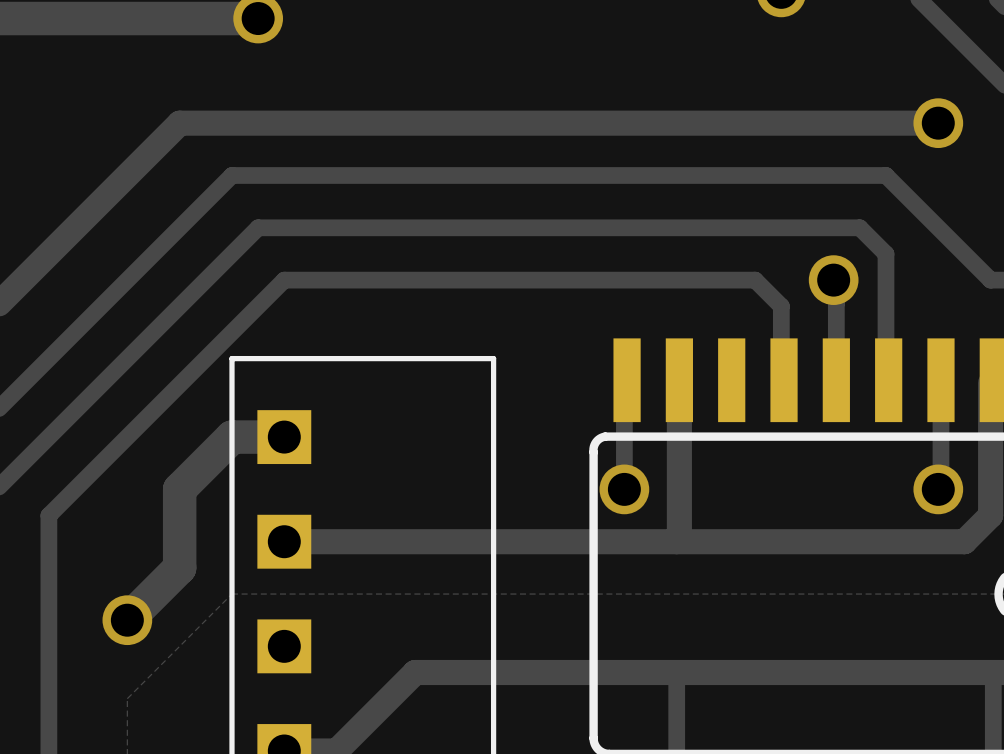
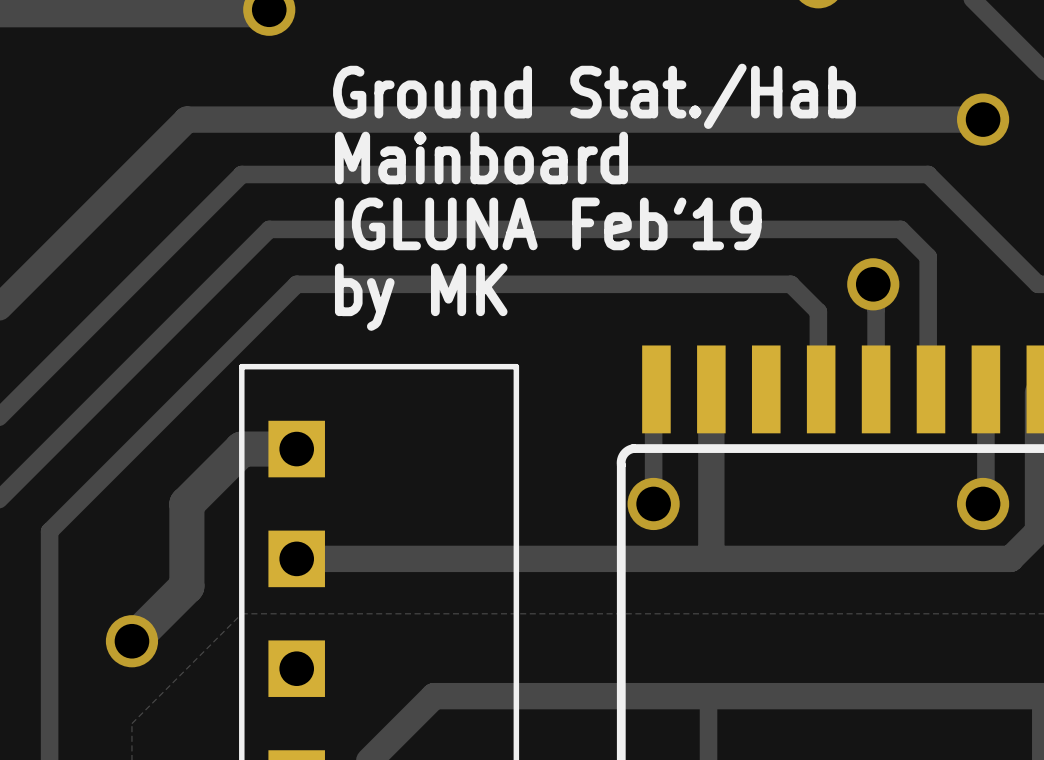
text: none -> Ground Stat./Hab (594, 96)
text: none -> Mainboard (481, 158)
text: none -> IGLUNA Feb'19 (548, 223)
text: none -> by MK (421, 297)

